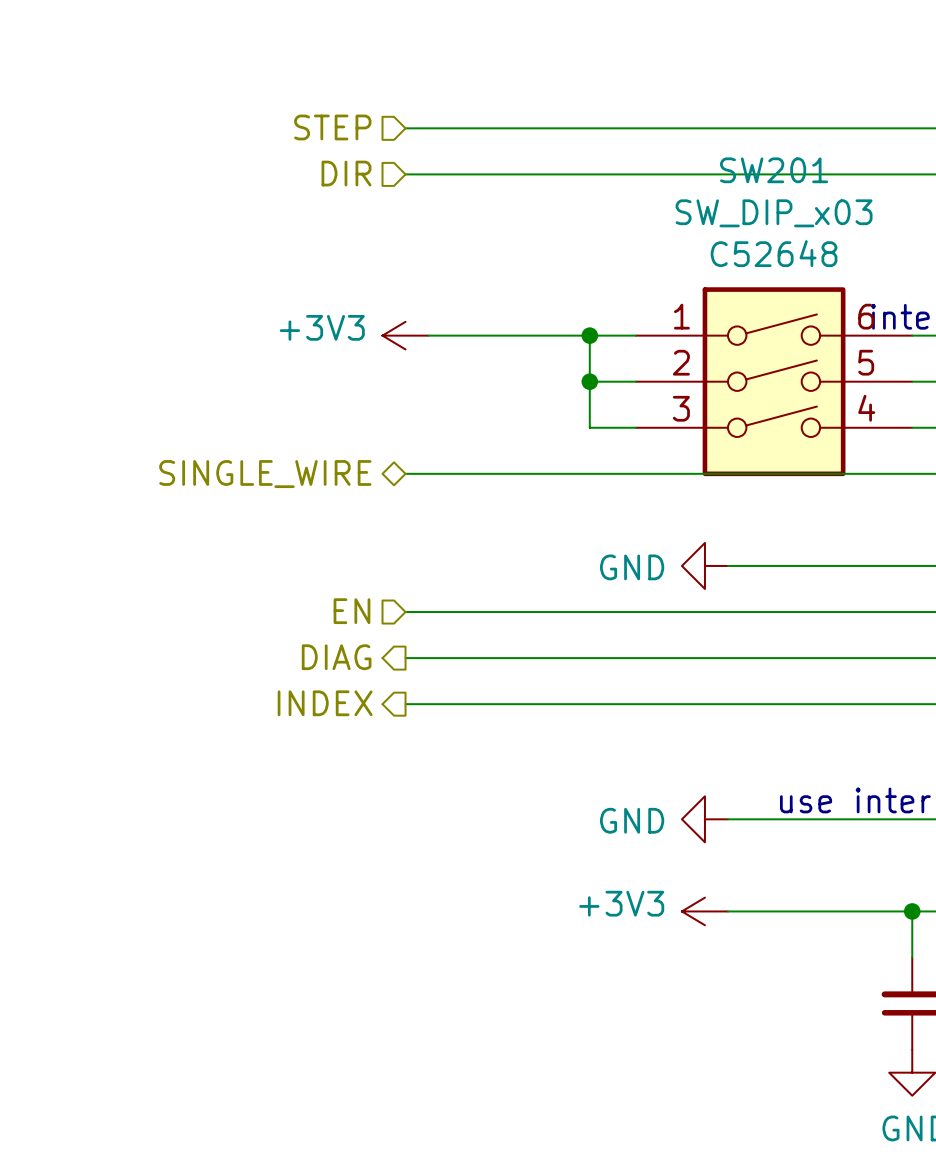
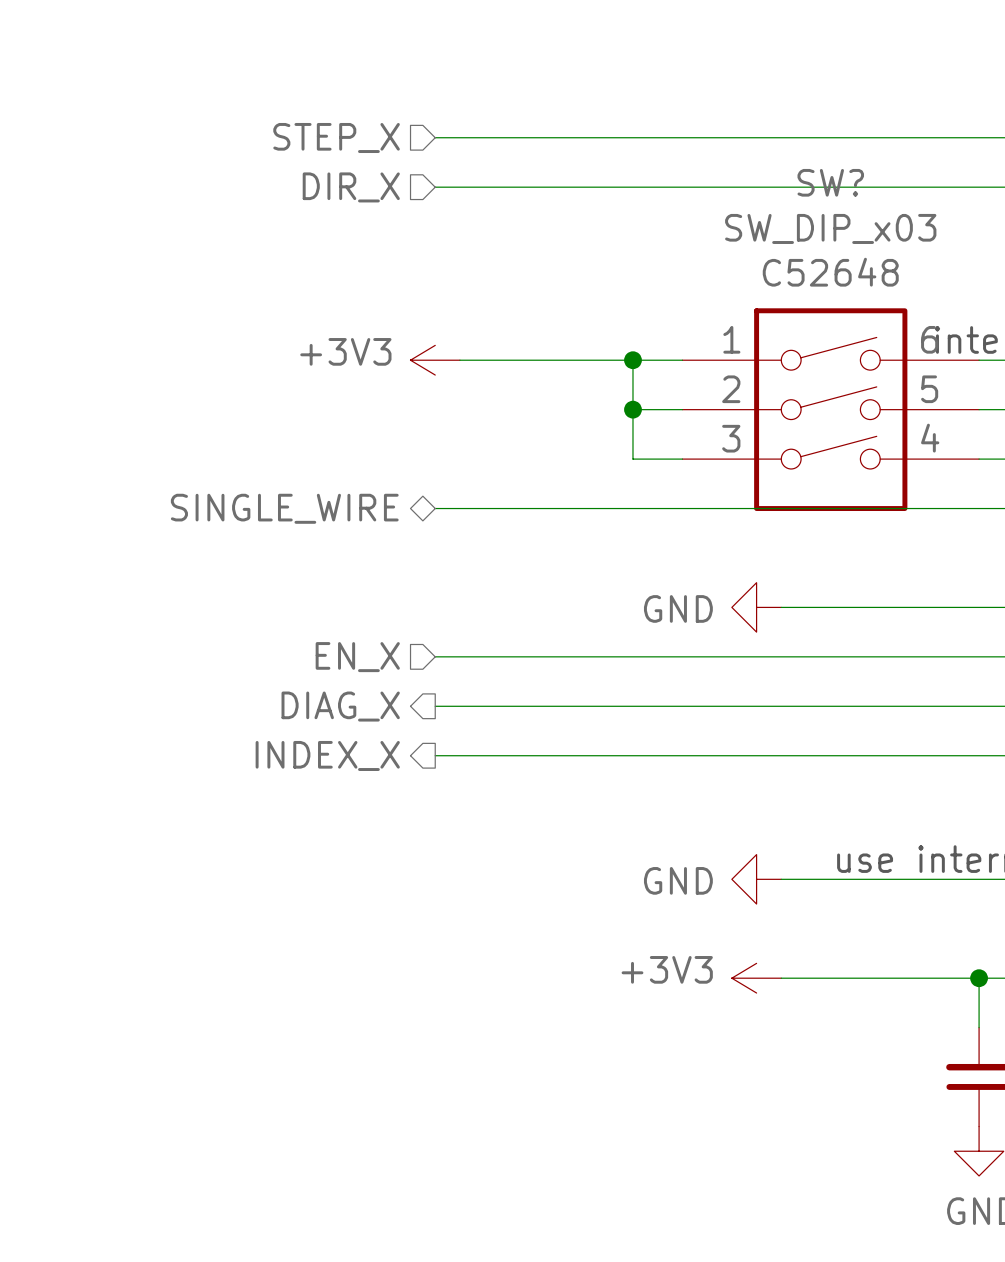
hierarchical label: STEP (332, 127) -> STEP_X (336, 137)
SW201 name: SW201 (774, 170) -> SW? (830, 182)
hierarchical label: DIR (346, 173) -> DIR_X (351, 187)
hierarchical label: EN (351, 611) -> EN_X (357, 657)
hierarchical label: DIAG (336, 657) -> DIAG_X (340, 706)
hierarchical label: INDEX (325, 703) -> INDEX_X (327, 755)

